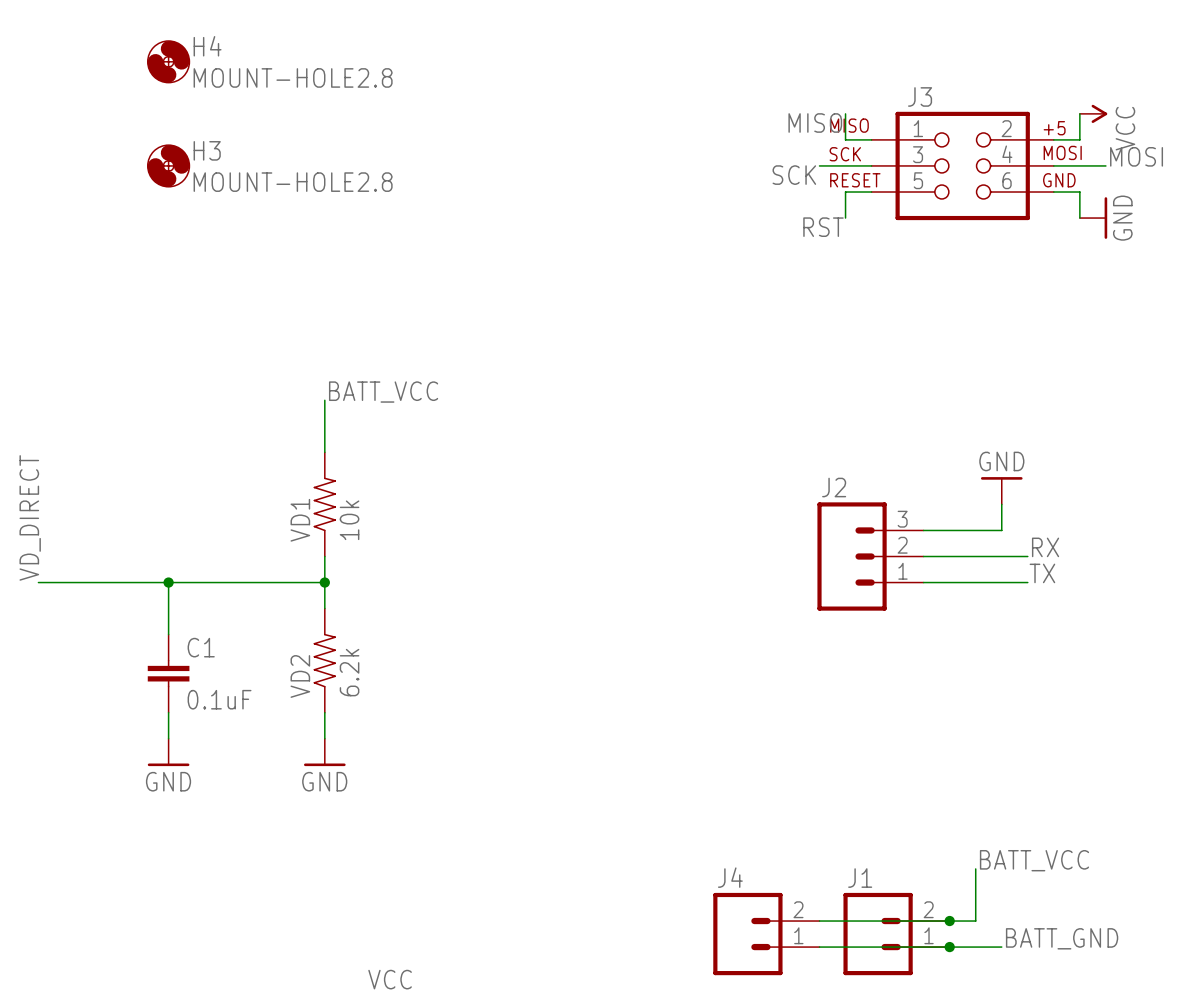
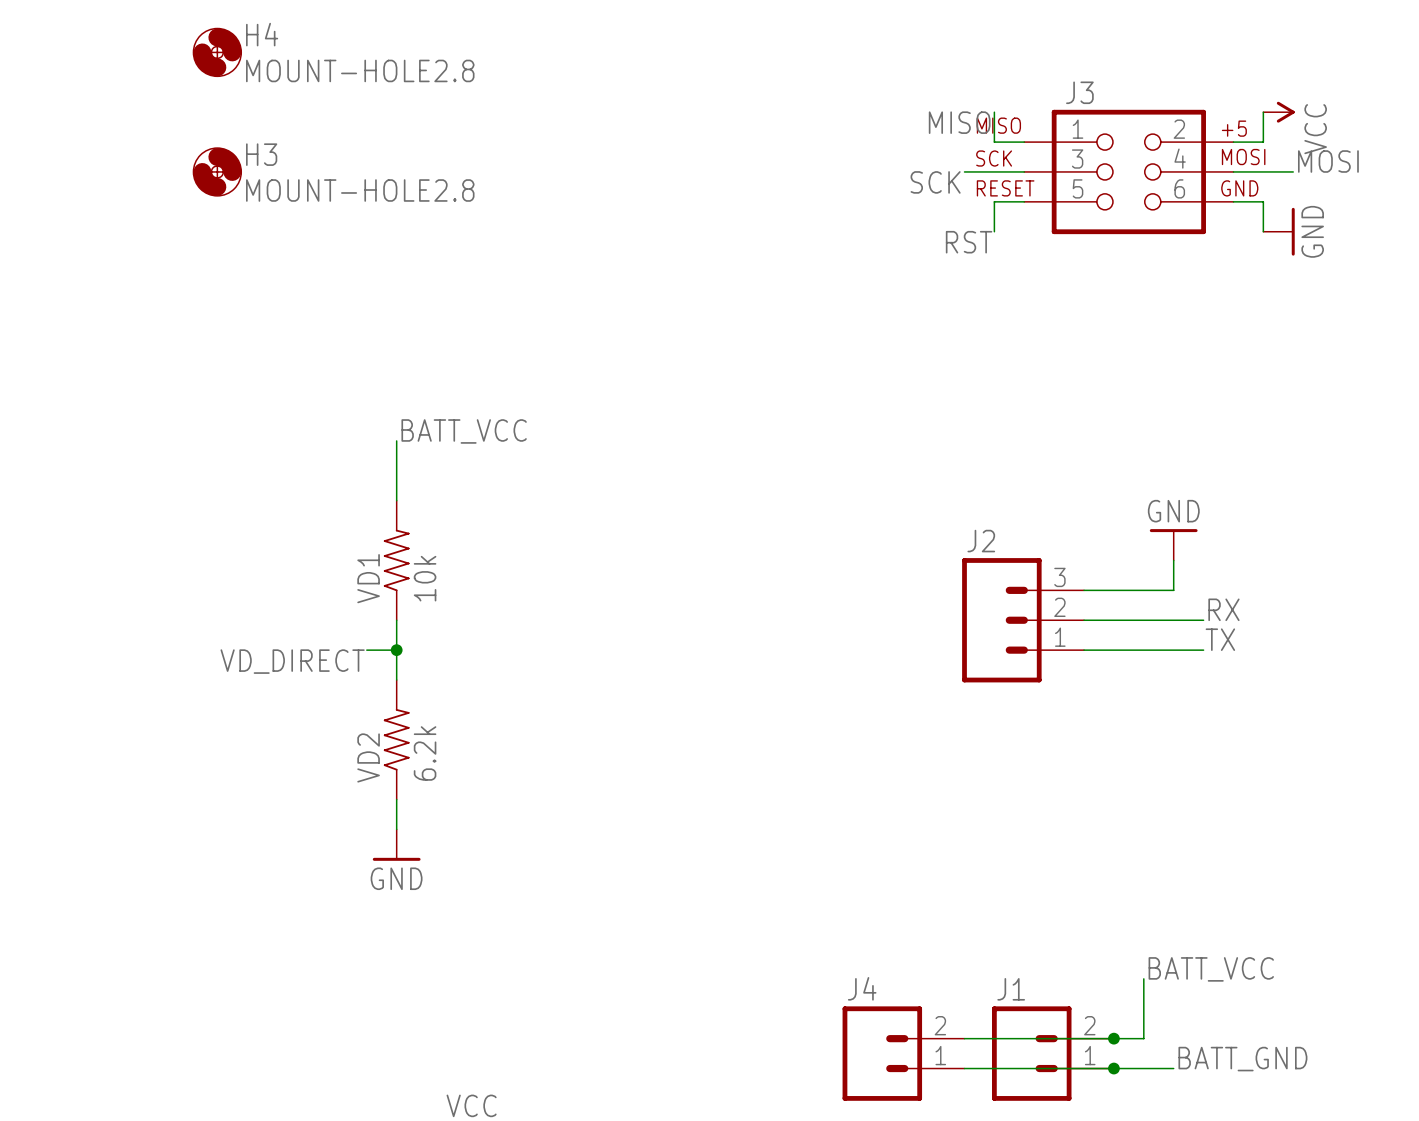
label: VD_DIRECT (30, 517) -> none
wire: (38, 582) (298, 582) -> none
wire: (168, 582) (168, 634) -> none
junction: (168, 582) -> none
label: none -> VD_DIRECT (292, 661)
C1: 0.1uF (168, 673) -> none
wire: (168, 712) (168, 738) -> none
power symbol: GND (168, 752) -> none

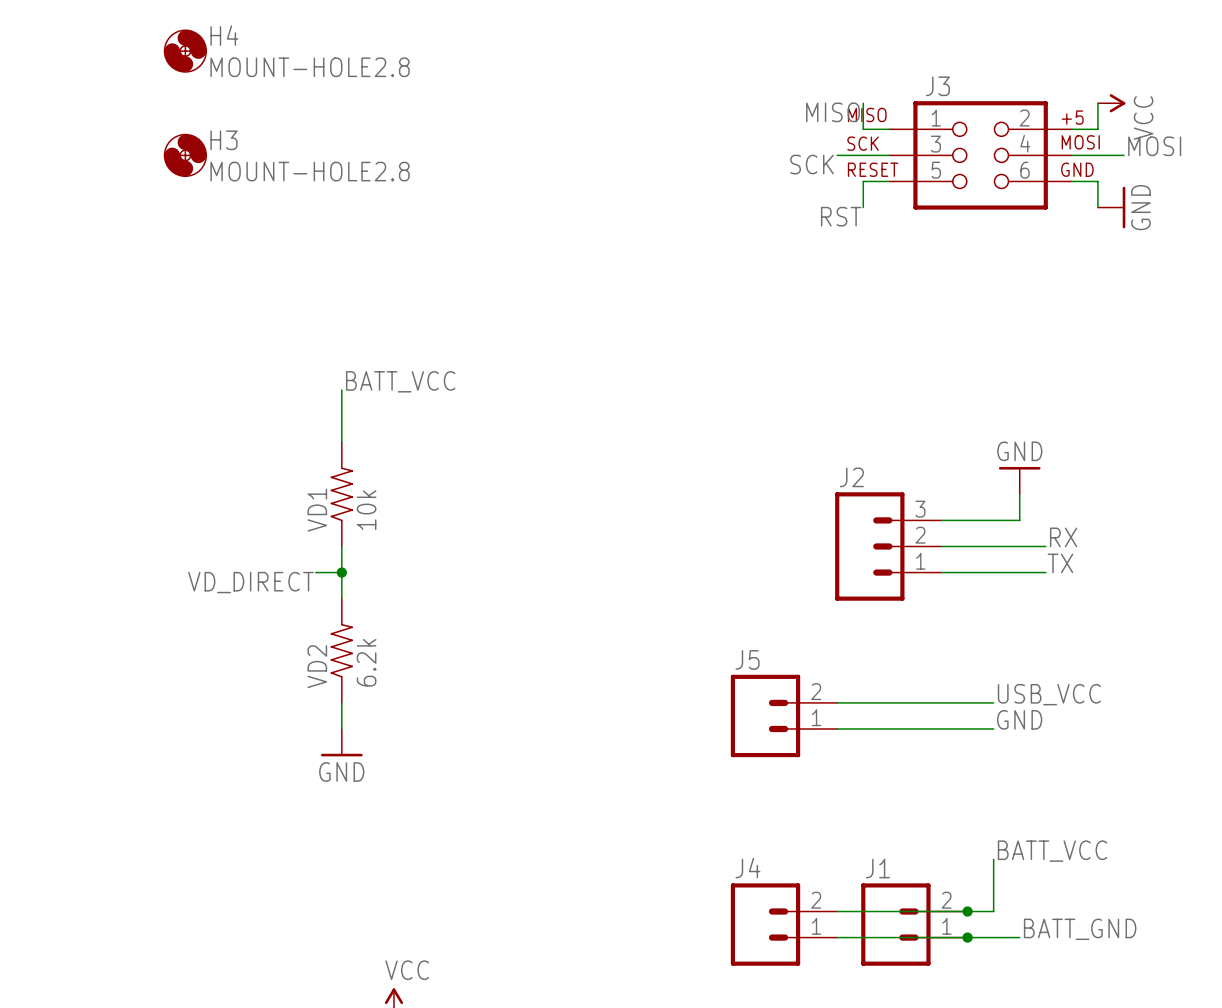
label: none -> USB_VCC (1049, 694)
wire: none -> (837, 702) (993, 702)
J5: none -> (784, 715)
label: none -> GND (1019, 719)
wire: none -> (837, 729) (993, 729)

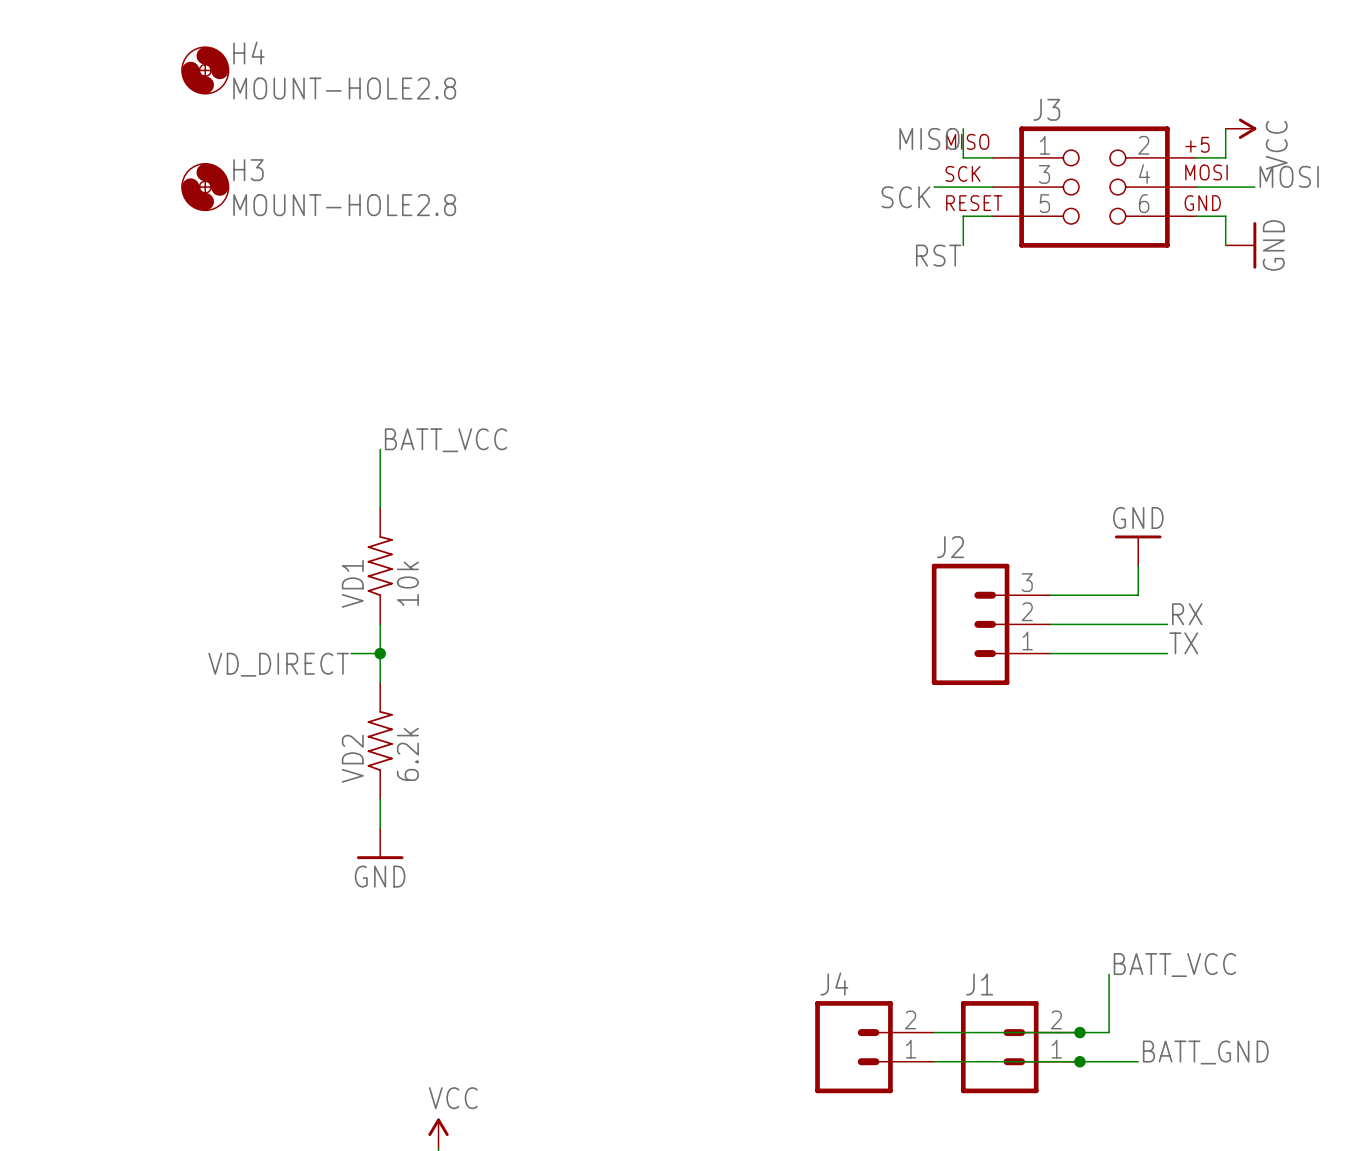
label: USB_VCC (1049, 694) -> none
wire: (837, 702) (993, 702) -> none
J5: (784, 715) -> none
label: GND (1019, 719) -> none
wire: (837, 729) (993, 729) -> none

